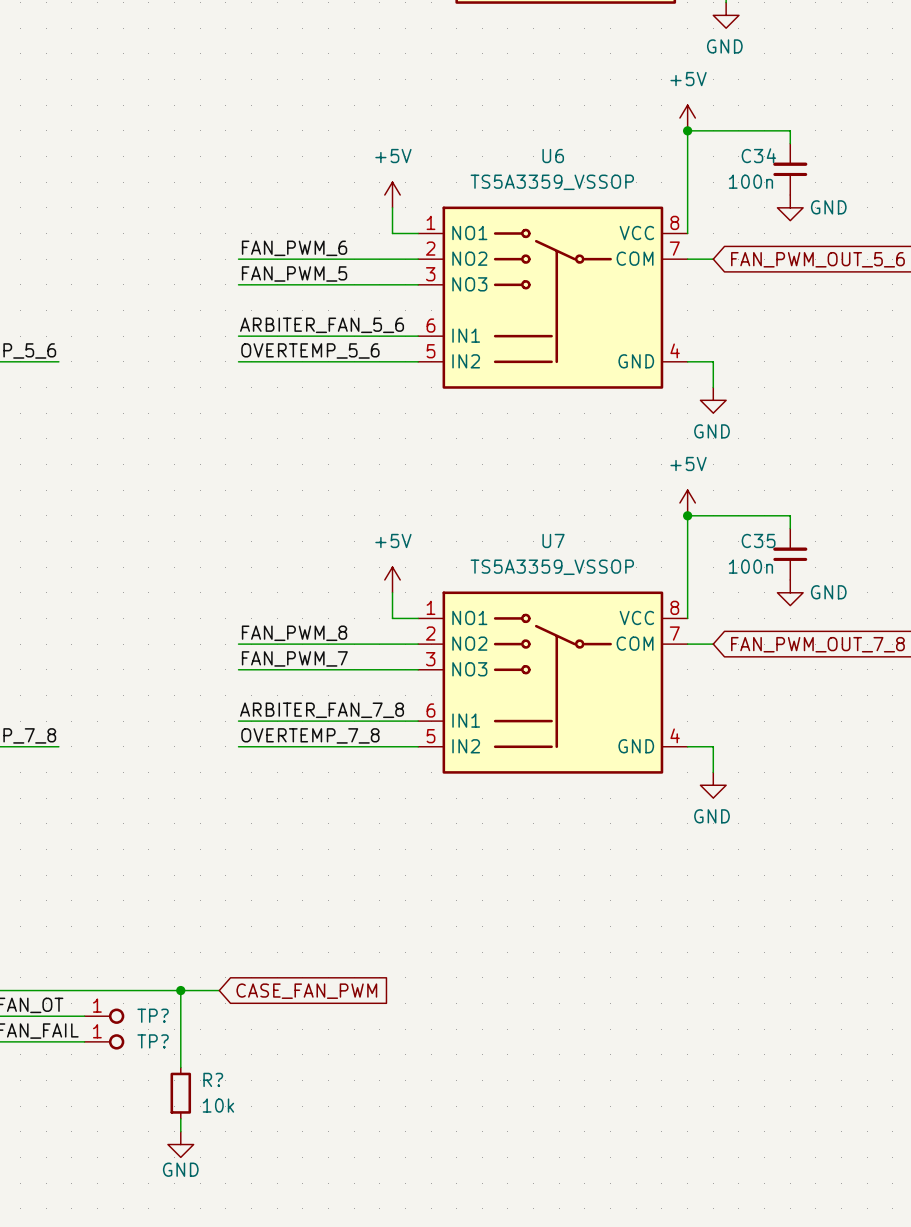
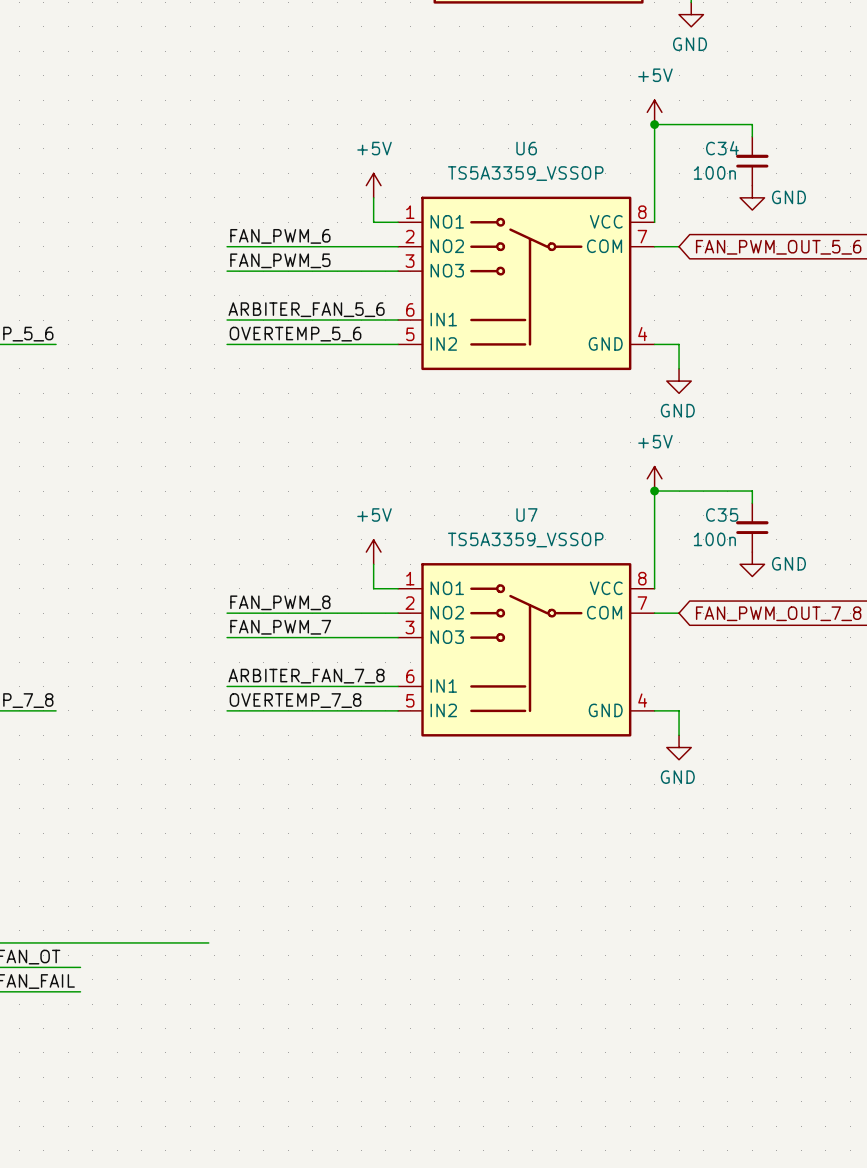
wire: (180, 990) (180, 1067) -> none
junction: (180, 990) -> none
global label: CASE_FAN_PWM (306, 991) -> none
TP?: (104, 1016) -> none
TP?: (104, 1041) -> none
R?: (180, 1093) -> none
wire: (180, 1118) (180, 1131) -> none
power symbol: GND (180, 1144) -> none

